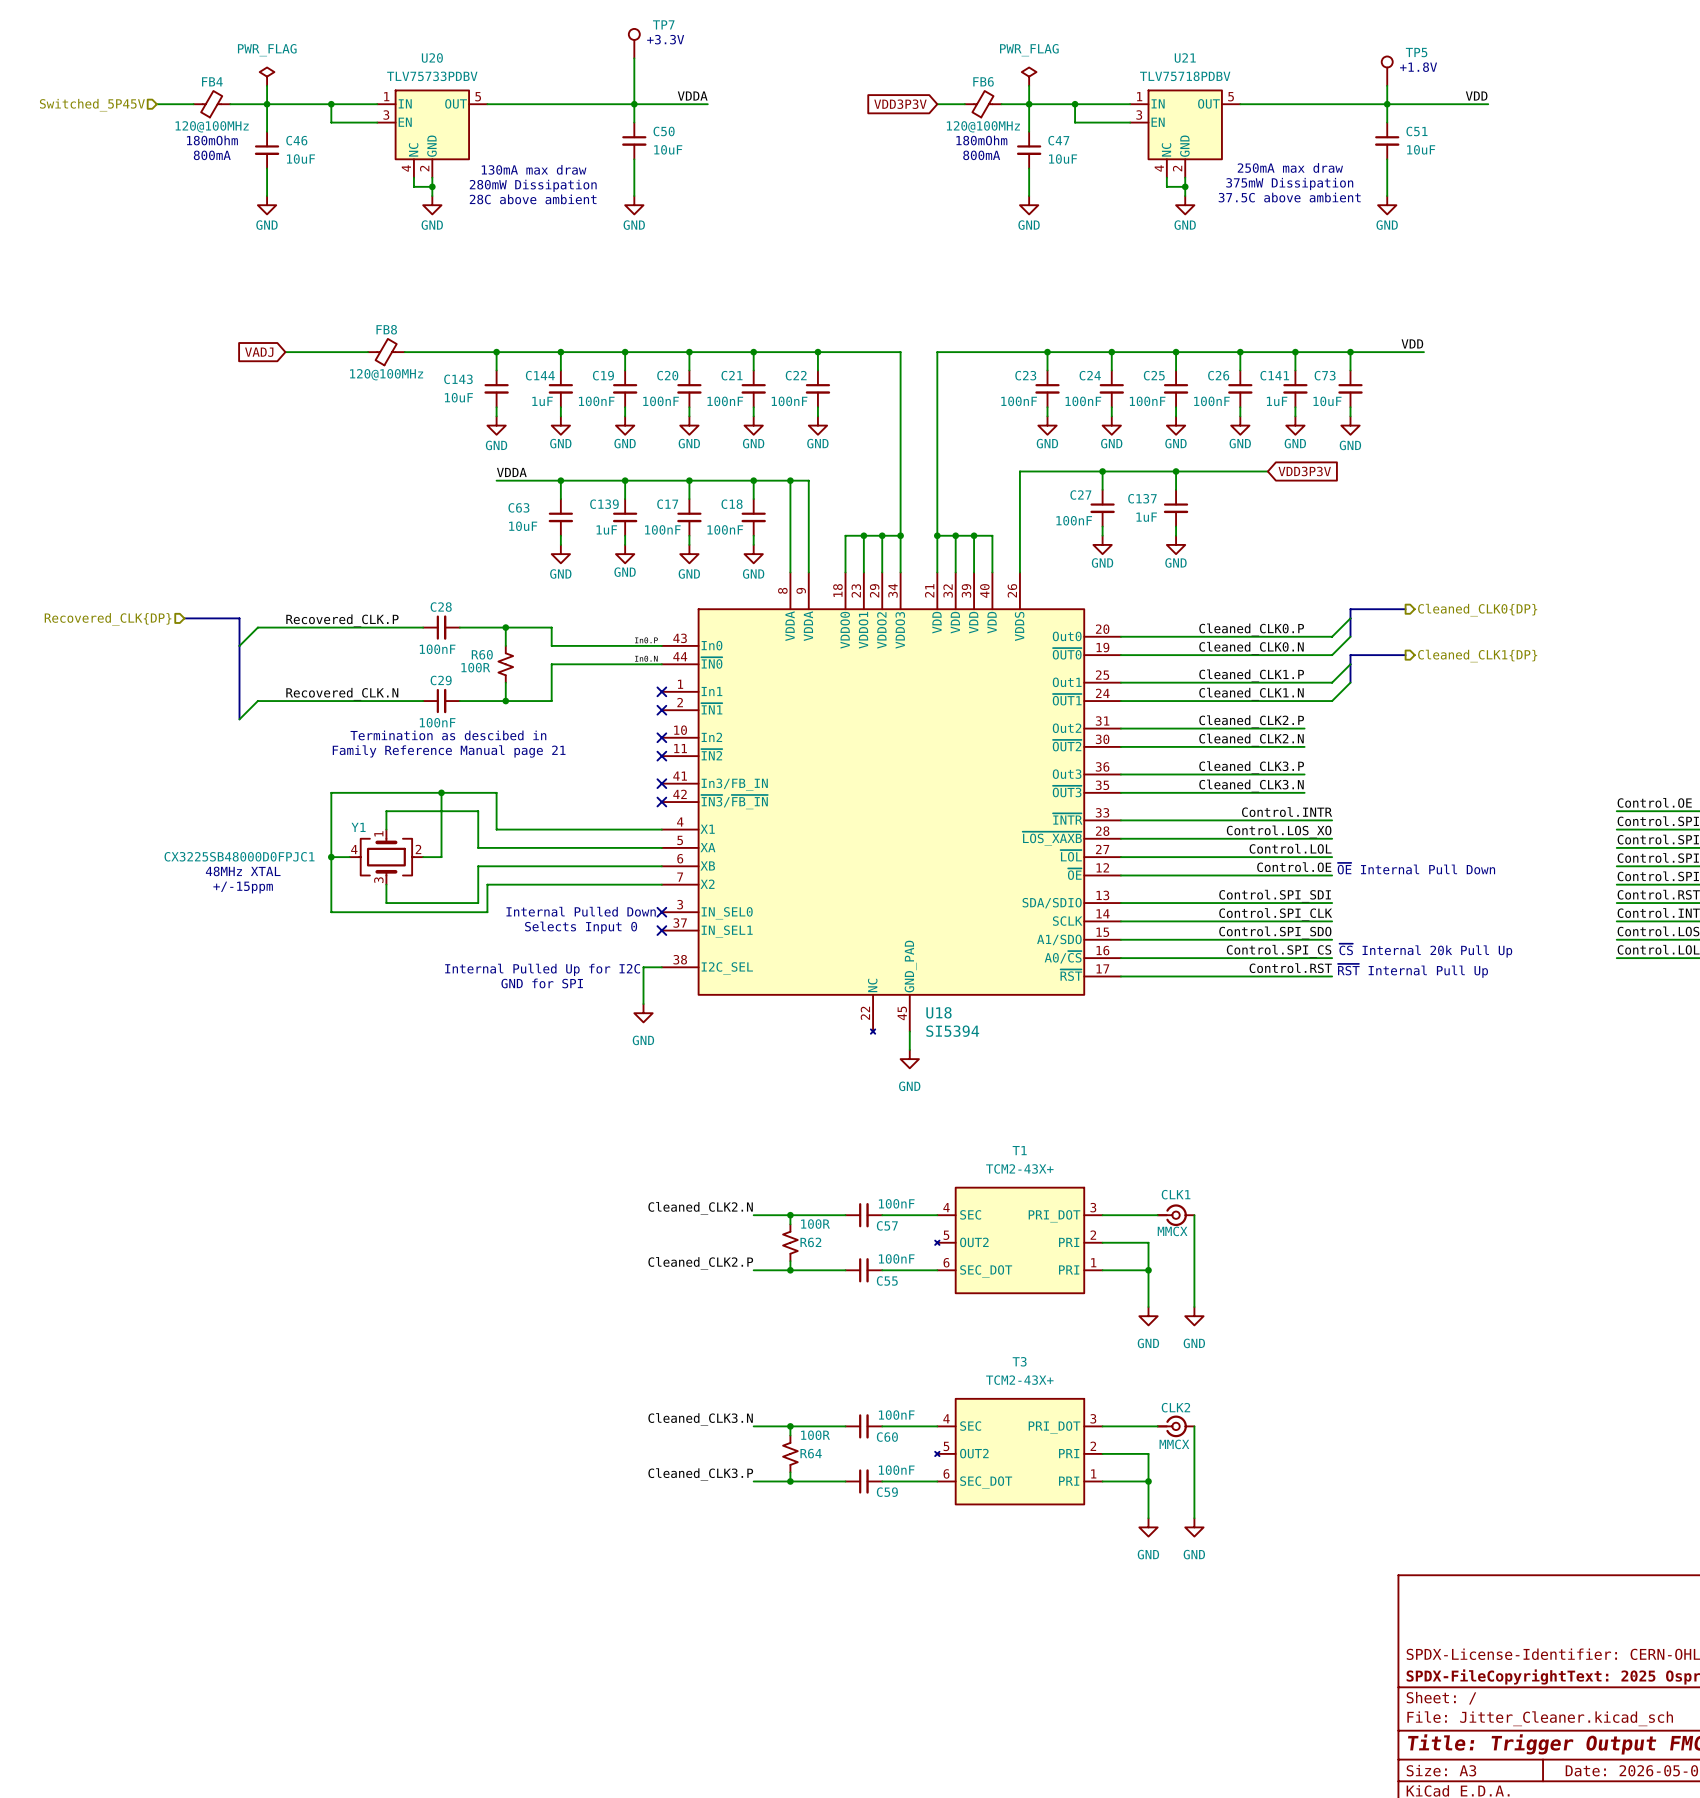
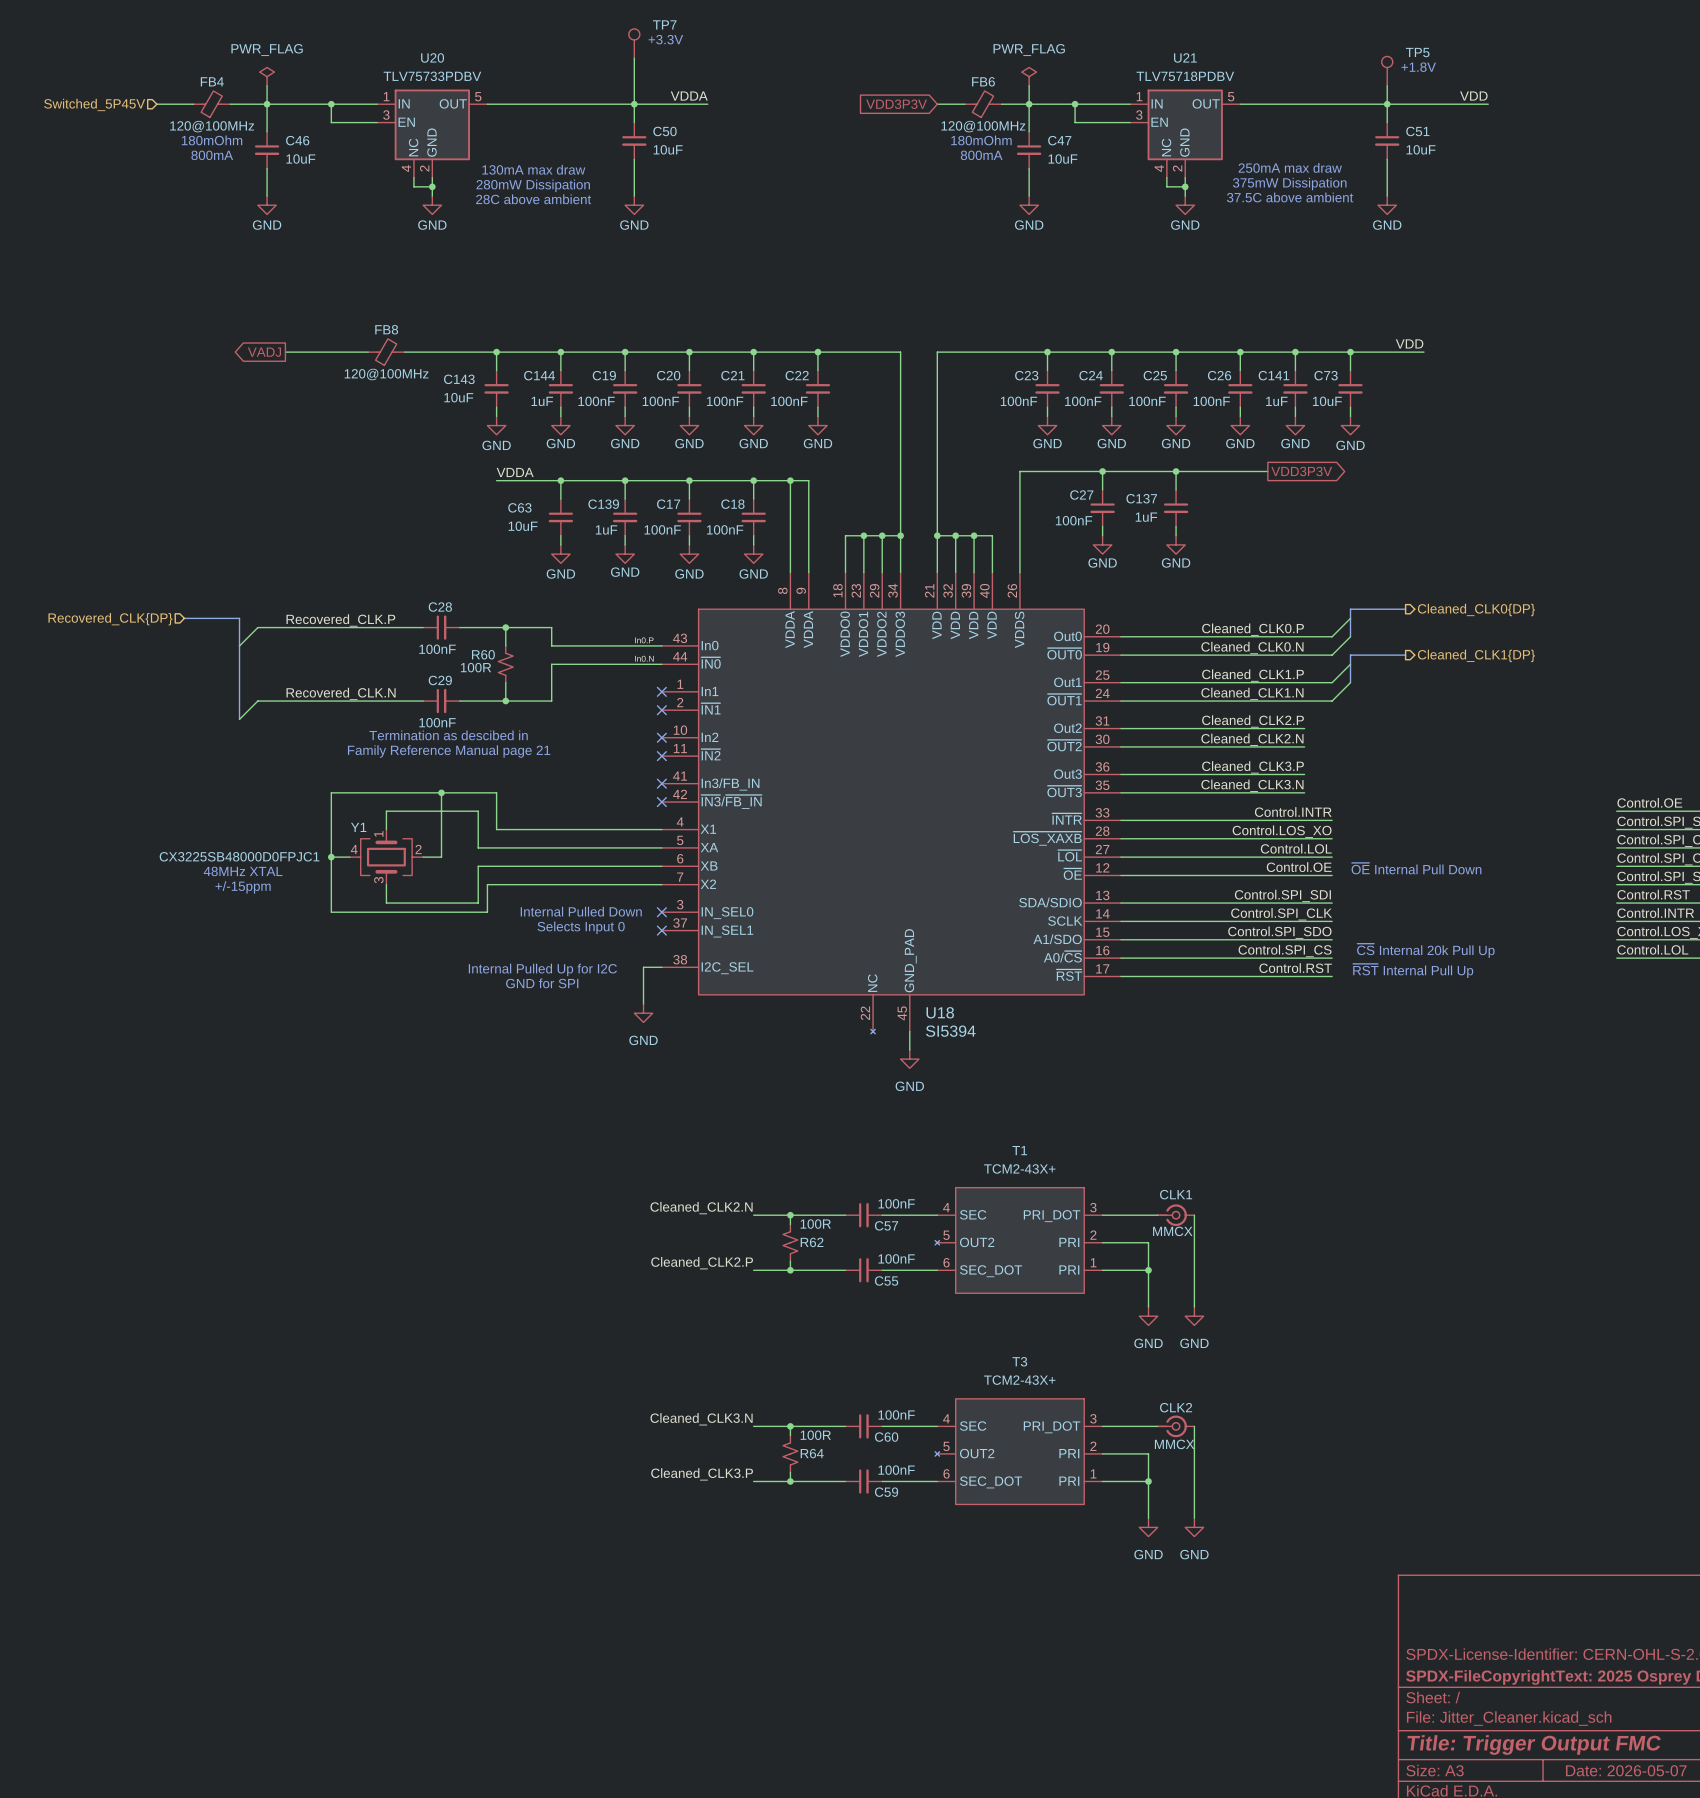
global label shape: input (259, 352) -> output (264, 352)
global label shape: input (1304, 471) -> output (1301, 471)

